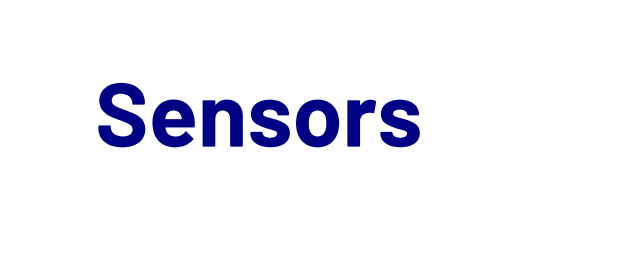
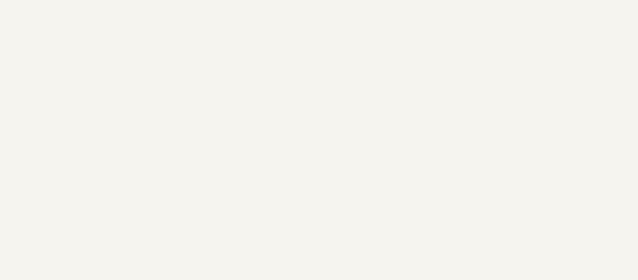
text: Sensors (259, 115) -> none

